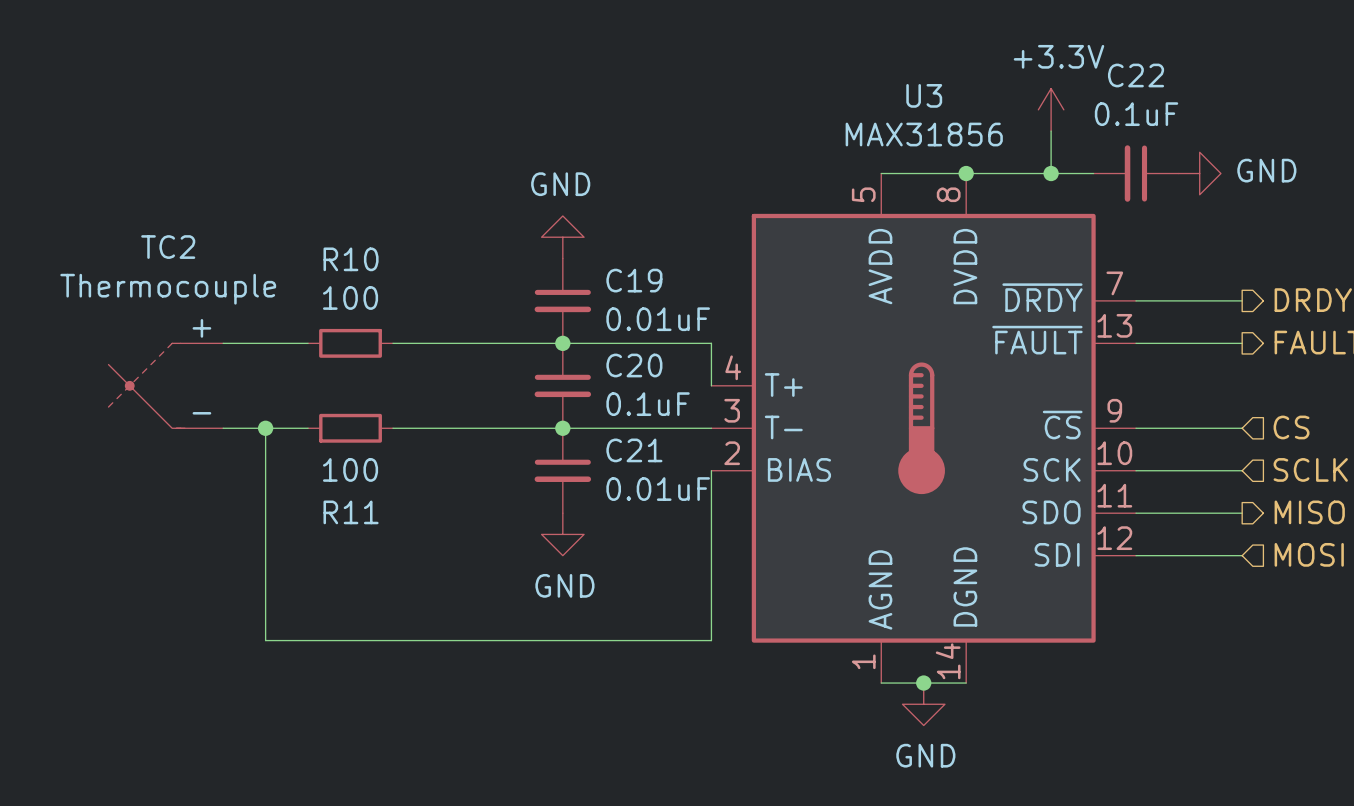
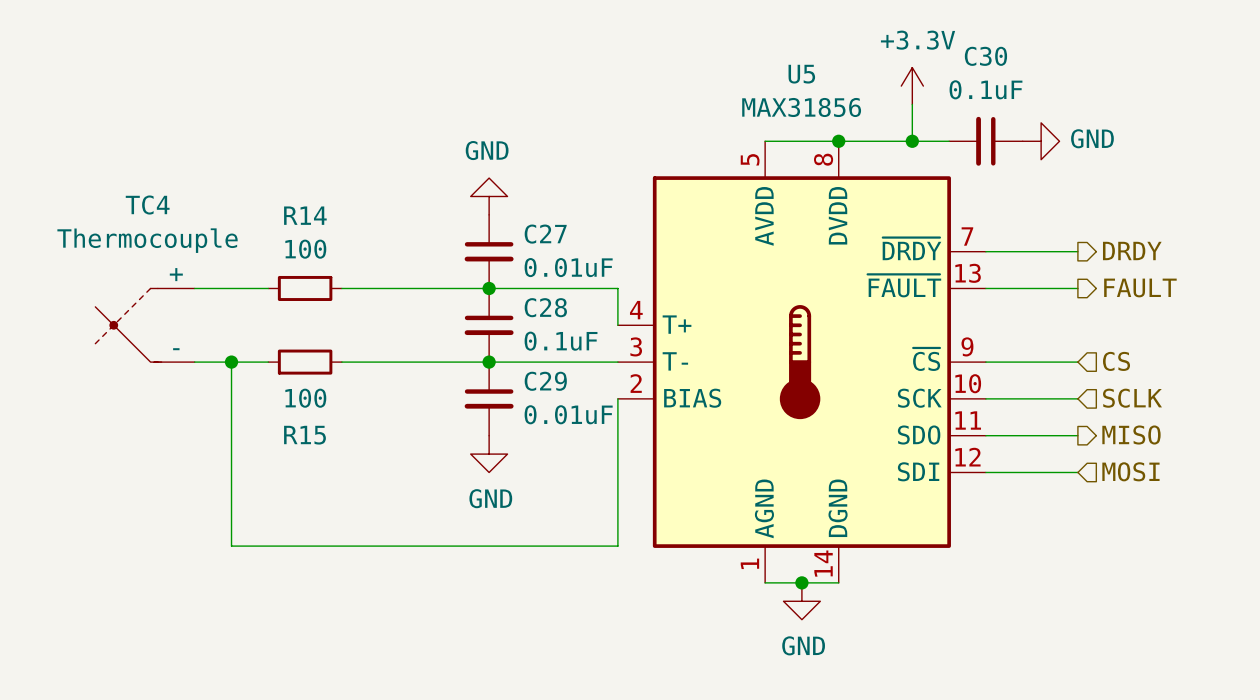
C22 name: C22 (1136, 75) -> C30 (985, 56)
U3 name: U3 (924, 95) -> U5 (801, 74)
TC2 name: TC2 (168, 247) -> TC4 (147, 205)
R10 name: R10 (351, 259) -> R14 (305, 215)
C19 name: C19 (634, 280) -> C27 (545, 234)
C20 name: C20 (634, 365) -> C28 (545, 307)
C21 name: C21 (634, 450) -> C29 (545, 381)
R11 name: R11 (351, 512) -> R15 (304, 435)

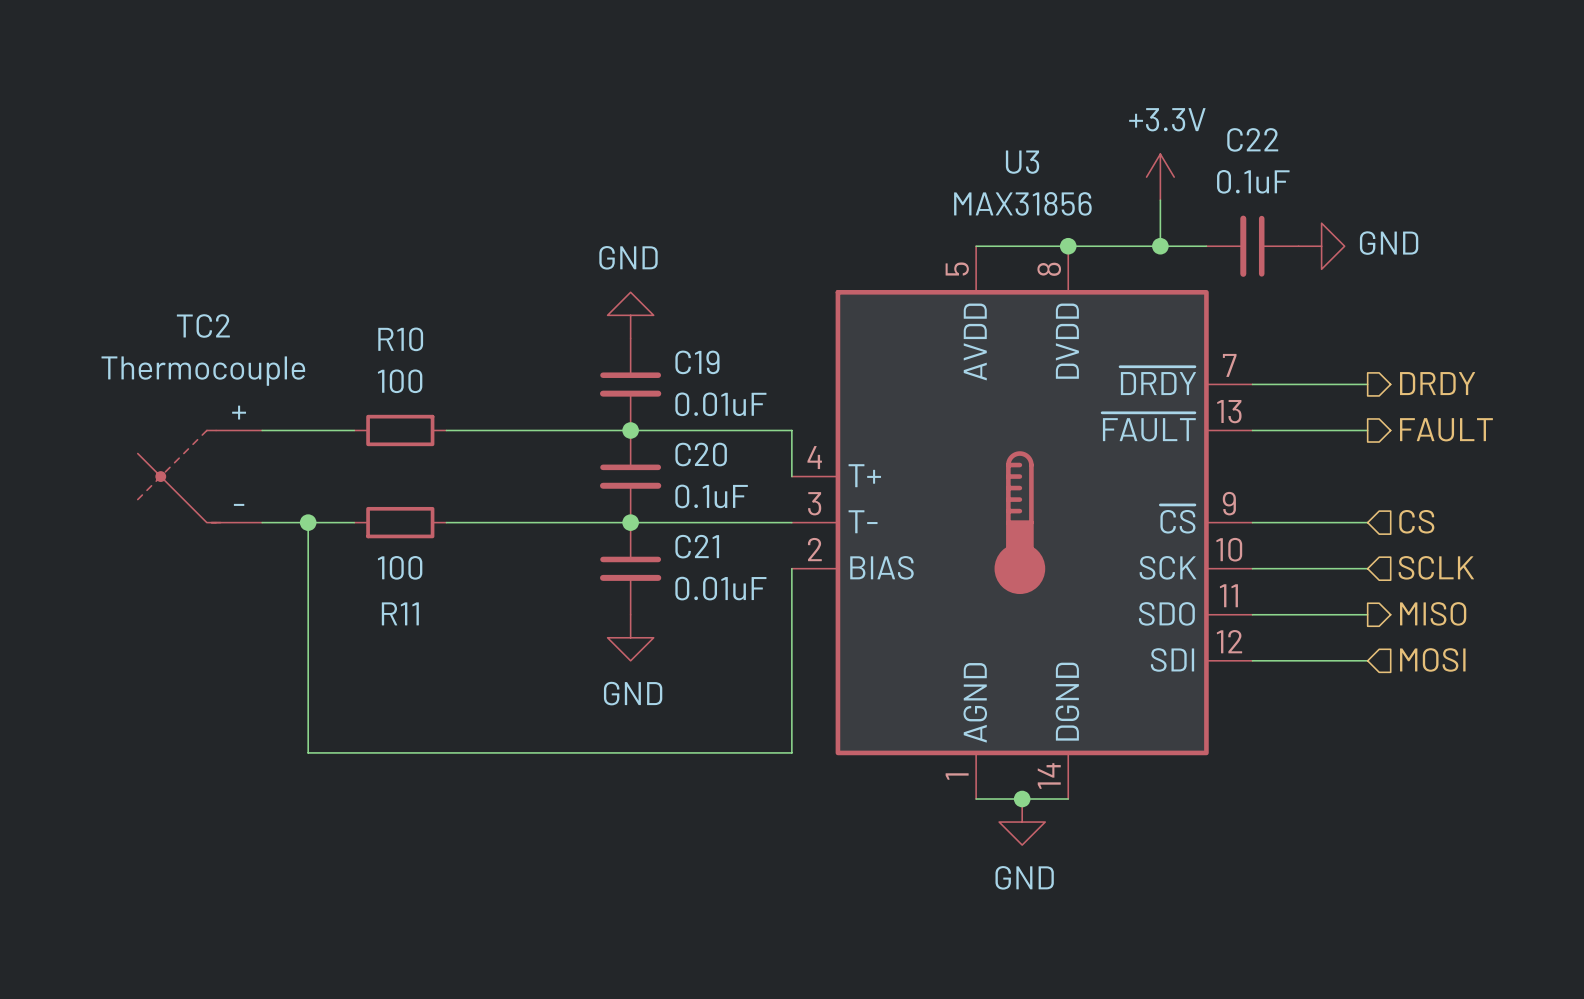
C30 name: C30 (985, 56) -> C22 (1252, 139)
U5 name: U5 (801, 74) -> U3 (1022, 162)
TC4 name: TC4 (147, 205) -> TC2 (203, 326)
R14 name: R14 (305, 215) -> R10 (400, 339)
C27 name: C27 (545, 234) -> C19 (697, 362)
C28 name: C28 (545, 307) -> C20 (701, 454)
C29 name: C29 (545, 381) -> C21 (697, 546)
R15 name: R15 (304, 435) -> R11 (400, 613)

